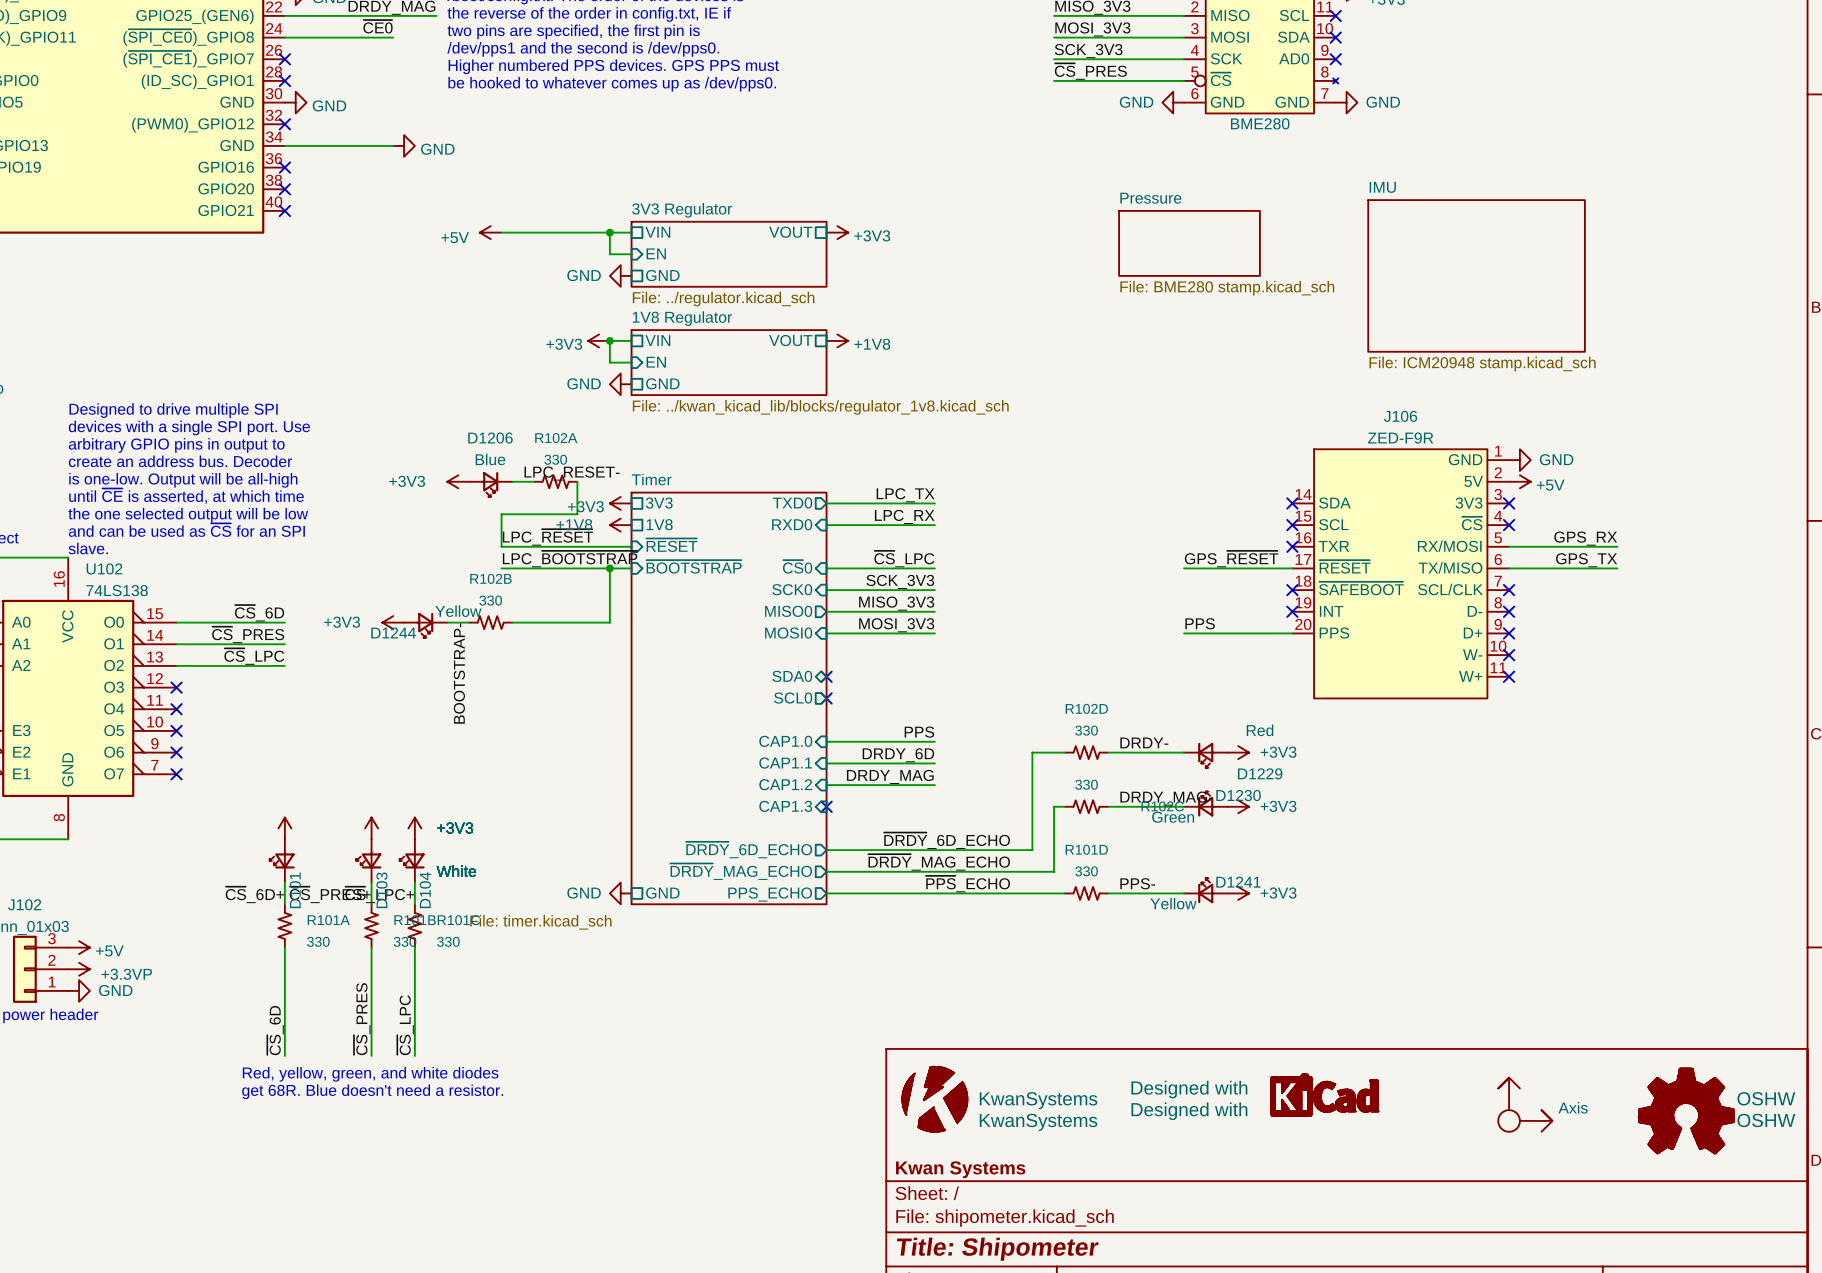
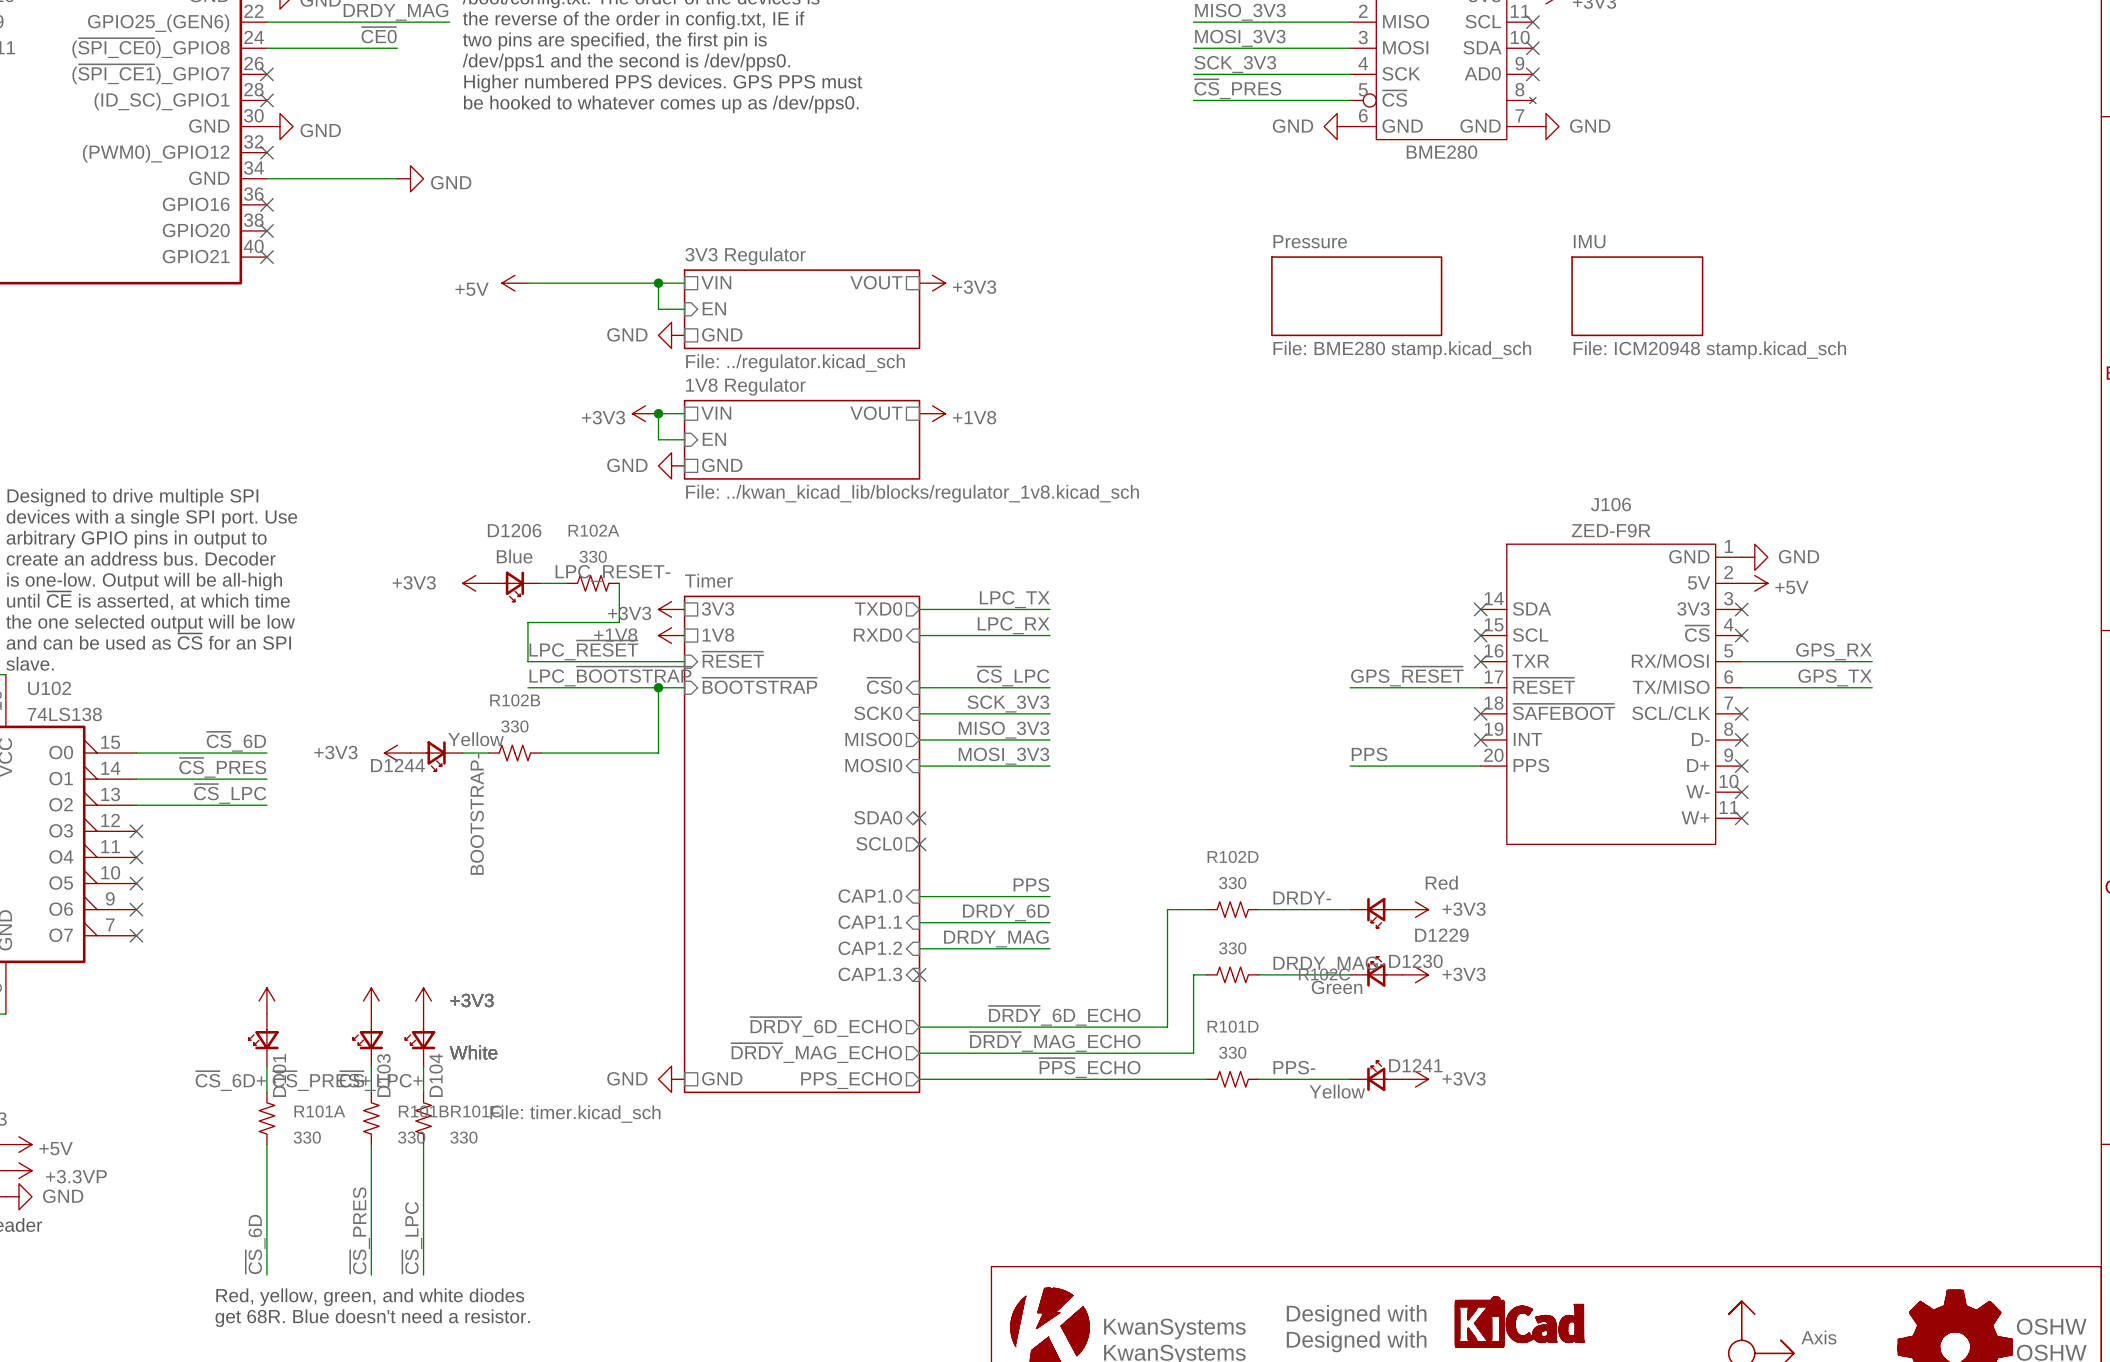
sheet IMU: none -> File: ICM20948 stamp.kicad_sch (1637, 296)
sheet IMU: File: ICM20948 stamp.kicad_sch (1476, 275) -> none

